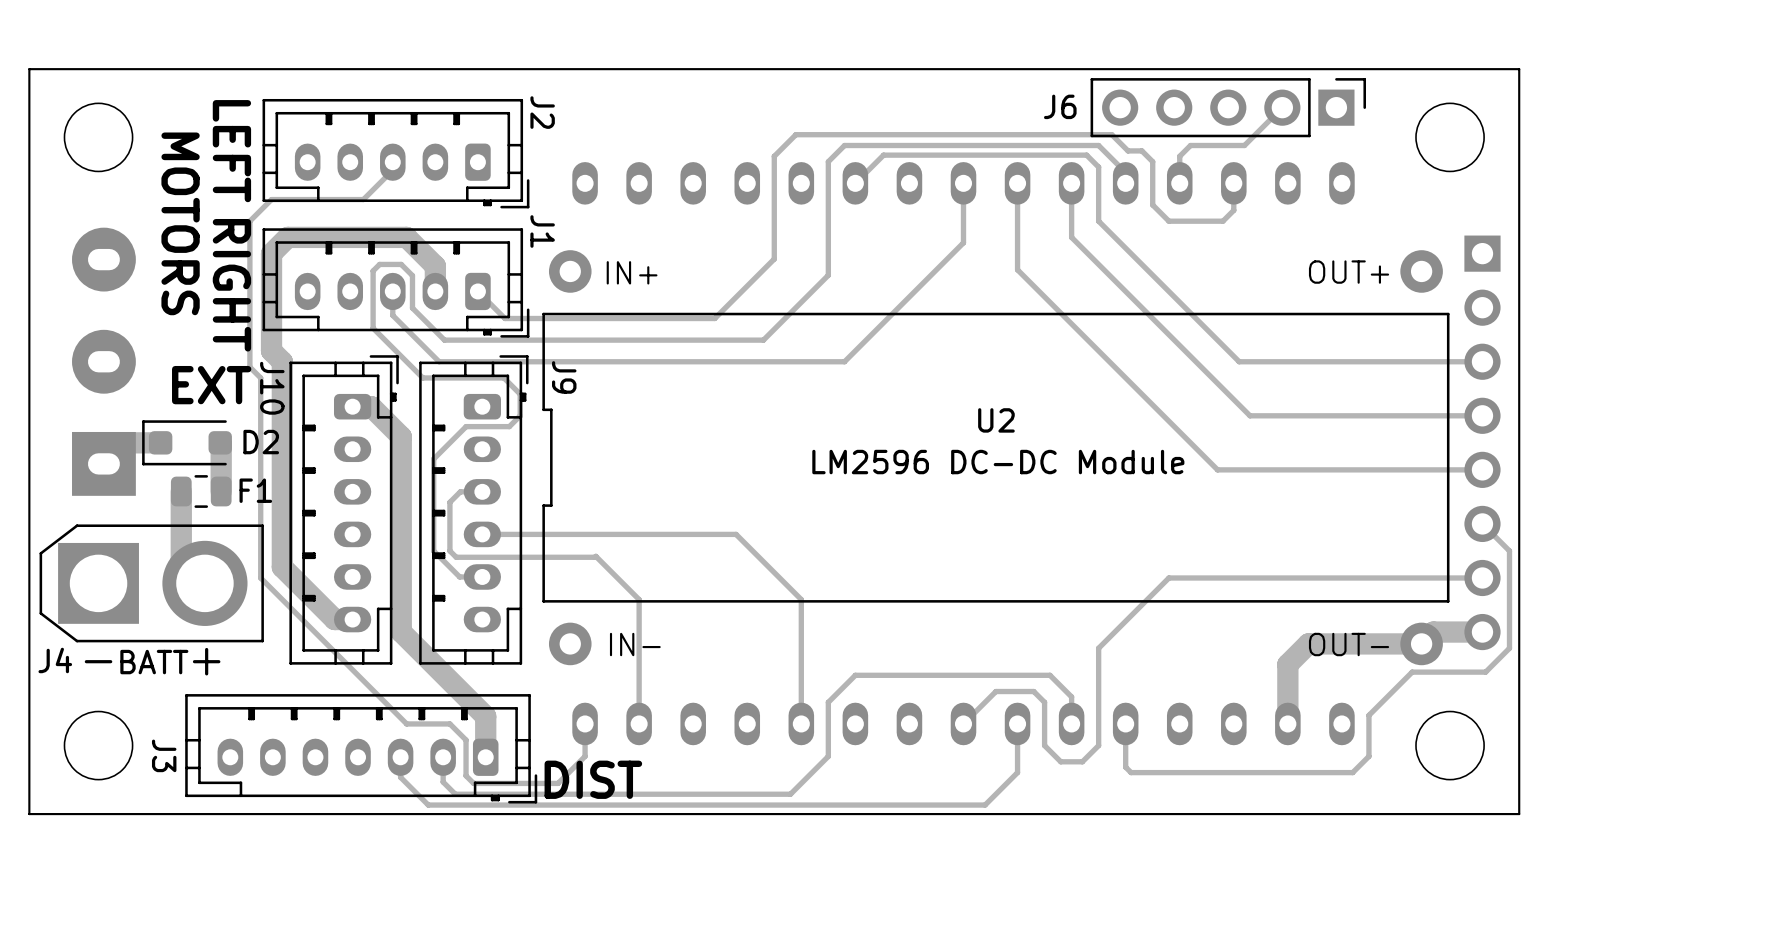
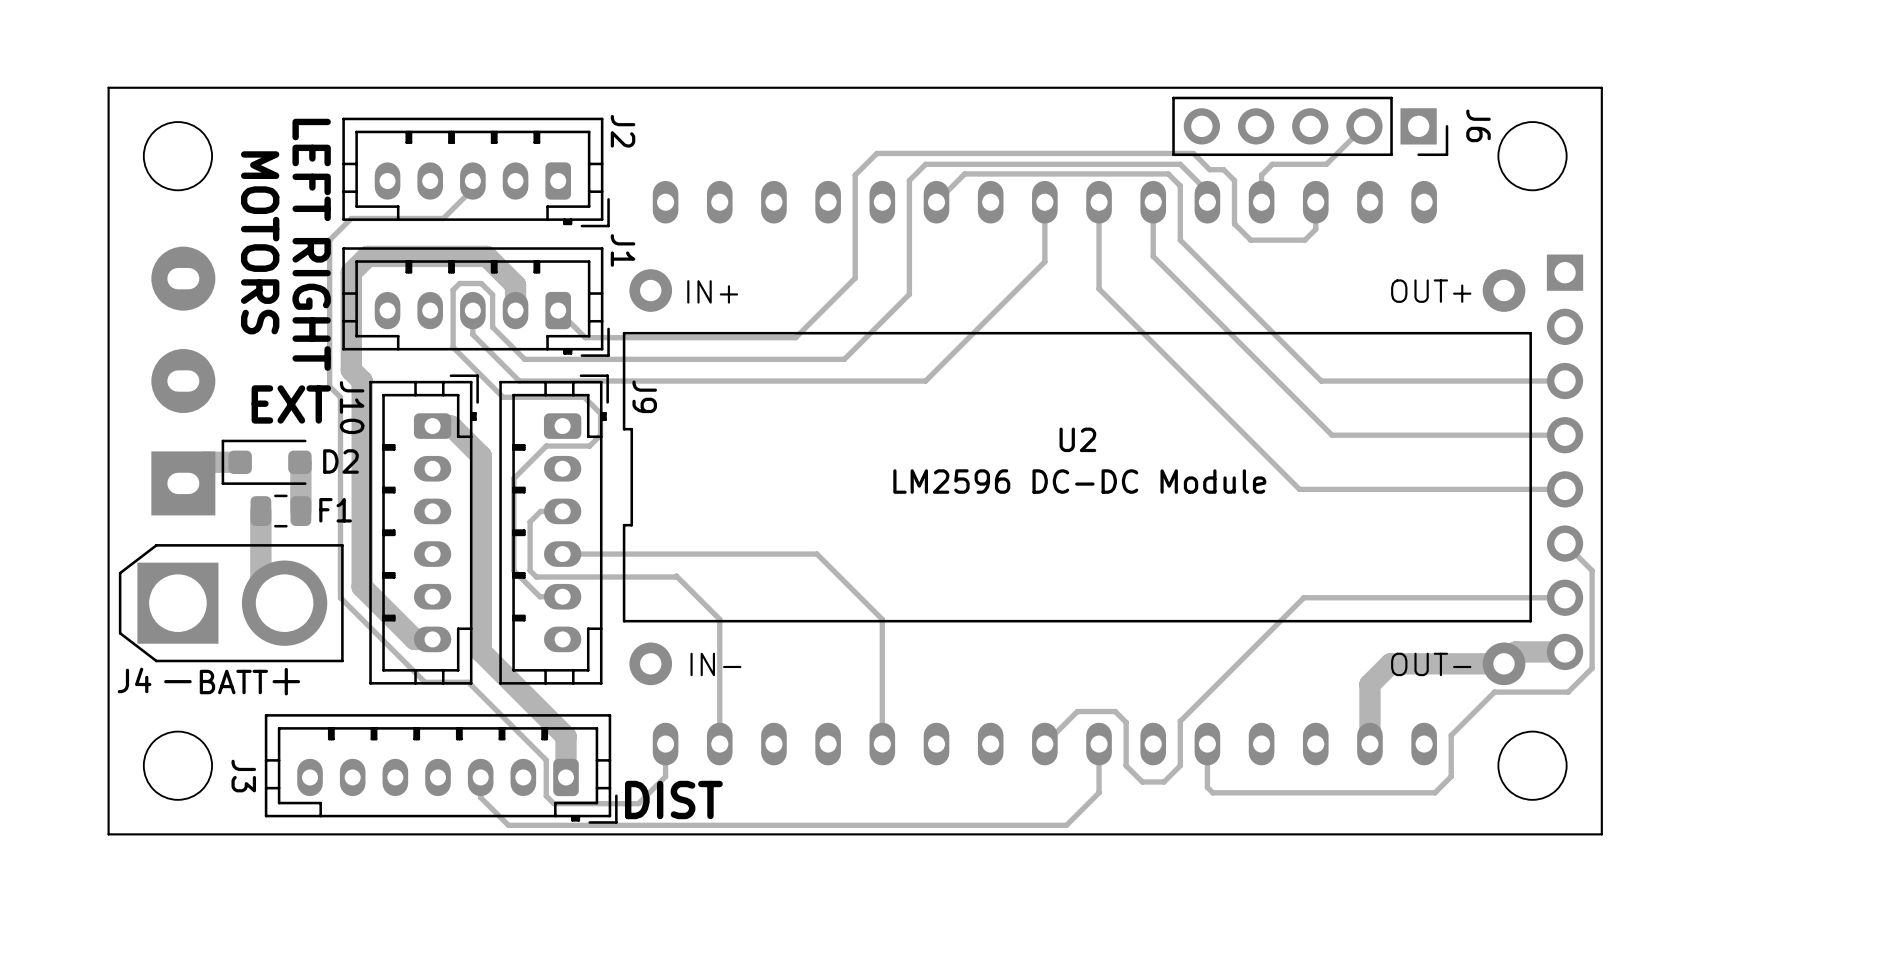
J6 footprint: [1090, 78, 1366, 138] -> [1172, 96, 1449, 157]
J6 name position: J6 (1060, 106) -> J6 (1478, 125)
track: (1221, 577) (1168, 577) (1098, 648) (1098, 701) -> (1303, 597) (1180, 721)
track: (345, 662) (406, 723) (449, 723) -> (425, 682) (468, 682) (530, 744)
track: (1071, 723) (1071, 696) (1049, 675) (855, 675) (828, 702) (828, 756) (790, 794) (455, 794) (443, 782) (443, 757) -> none

